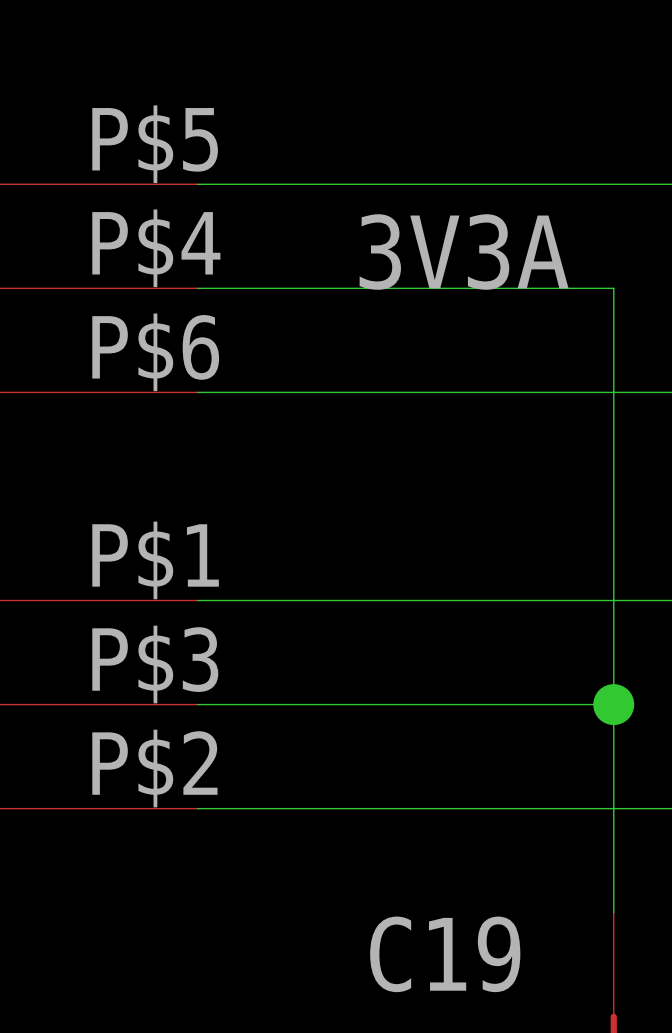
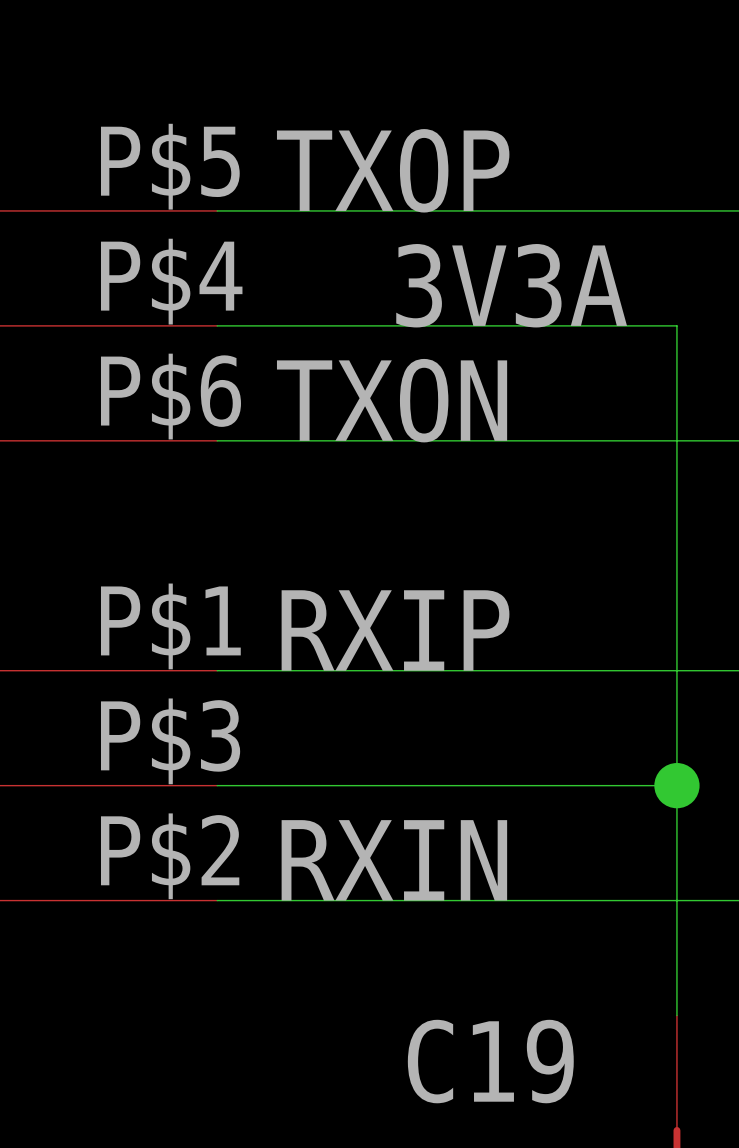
label: none -> TXOP (393, 170)
label: none -> TXON (392, 400)
label: none -> RXIP (395, 630)
label: none -> RXIN (394, 860)

